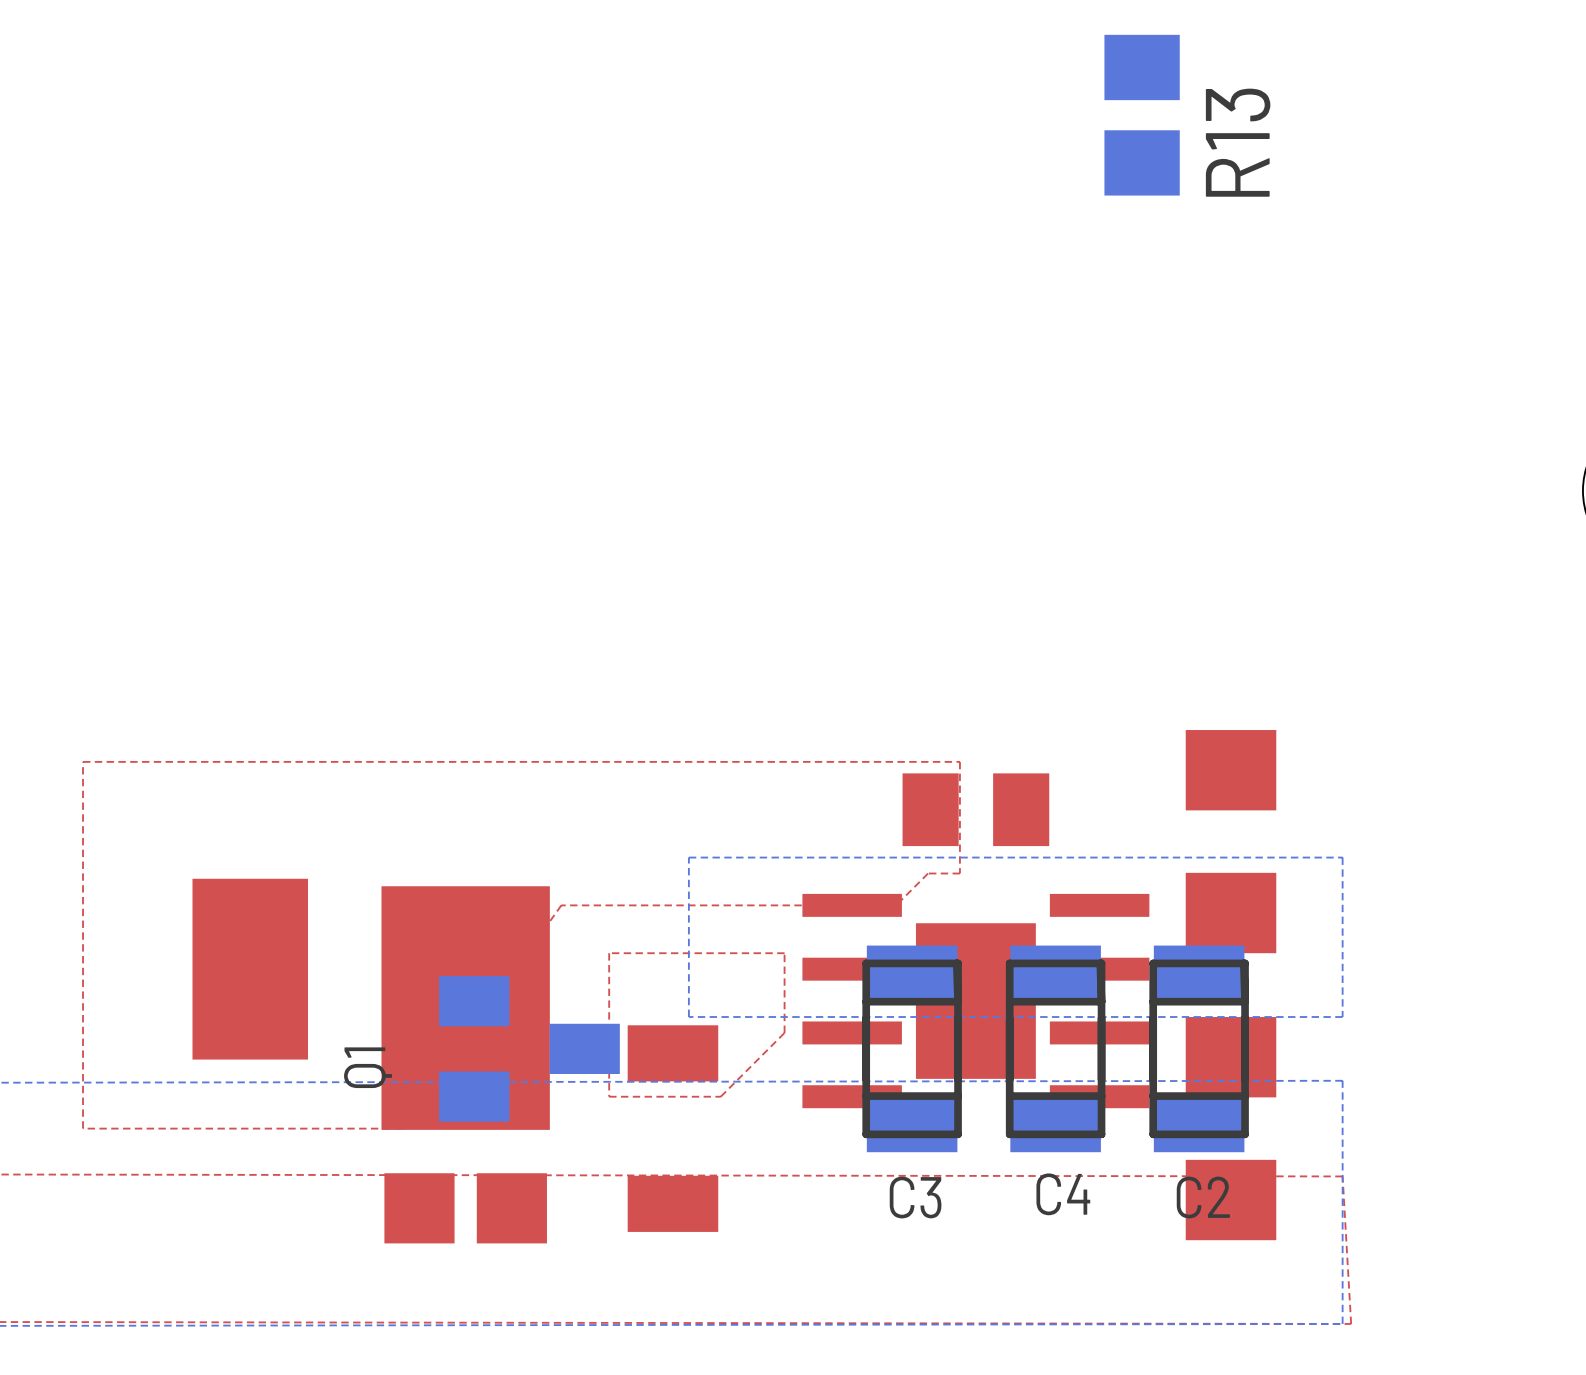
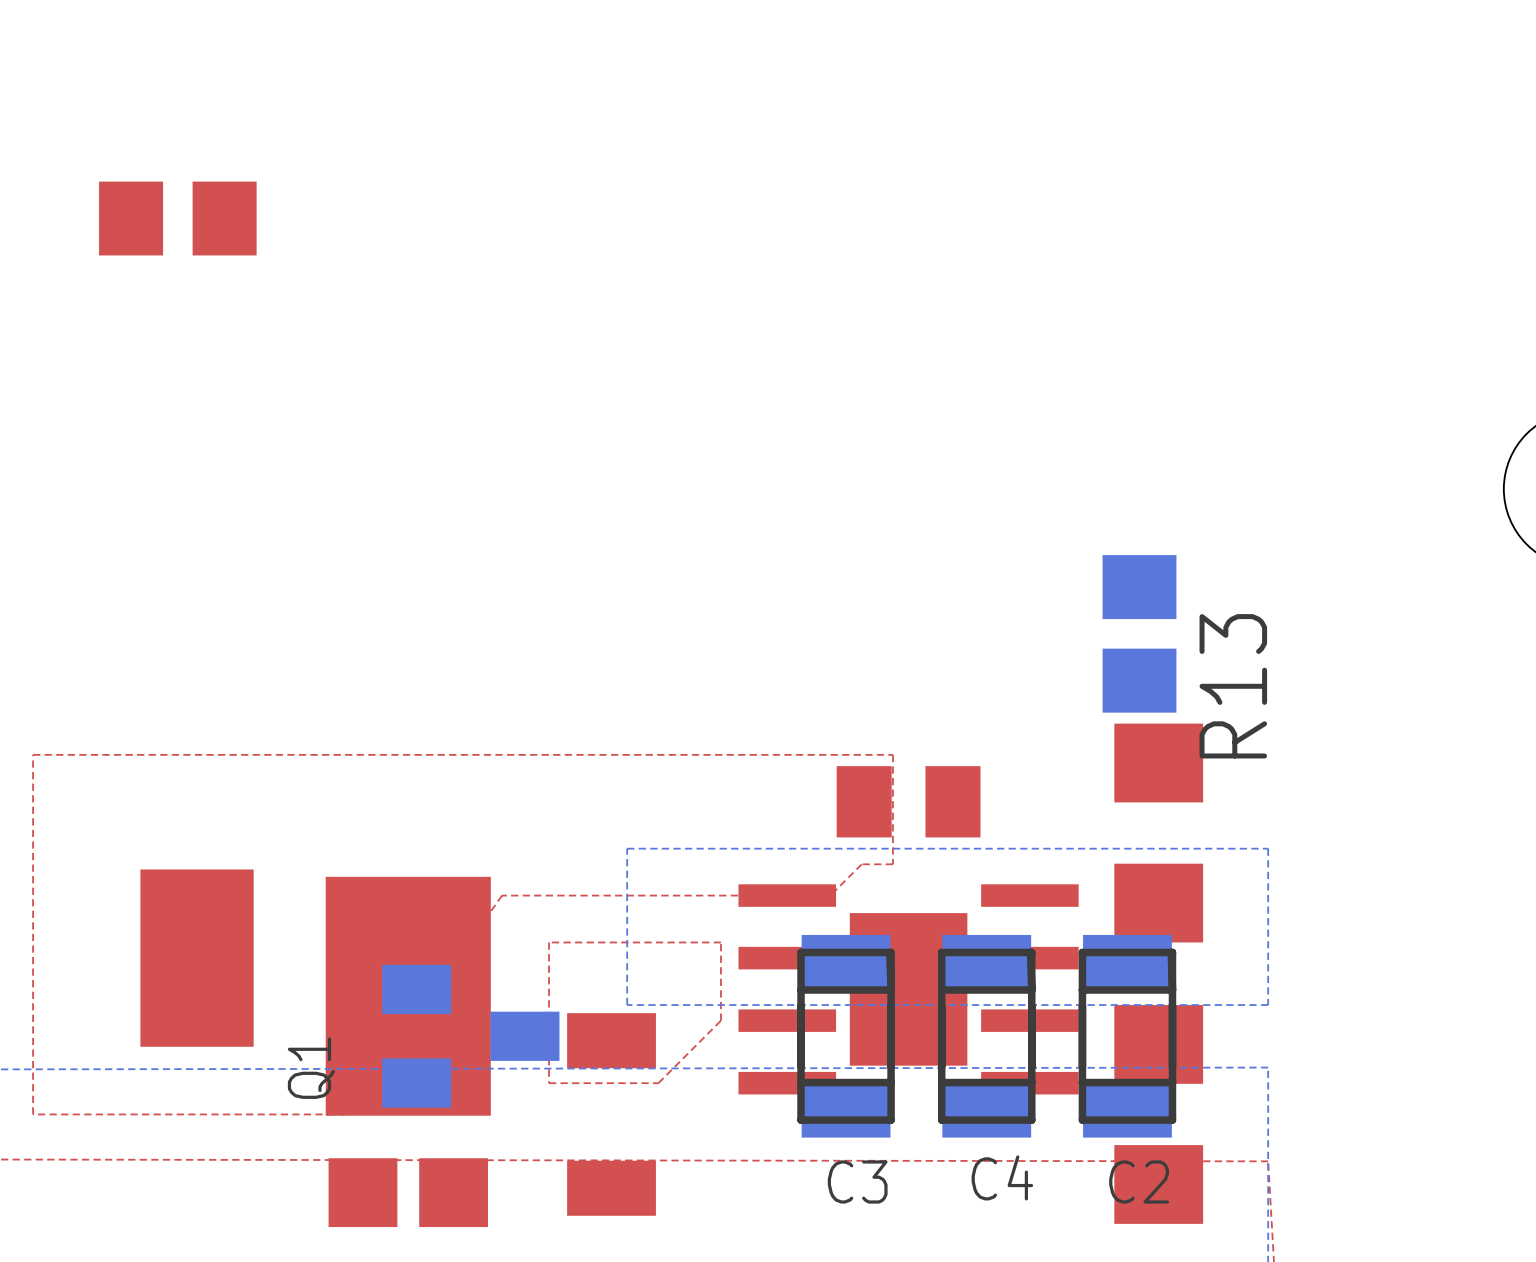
R13 position: (1142, 115) -> (1139, 633)
part: none -> (177, 218)

